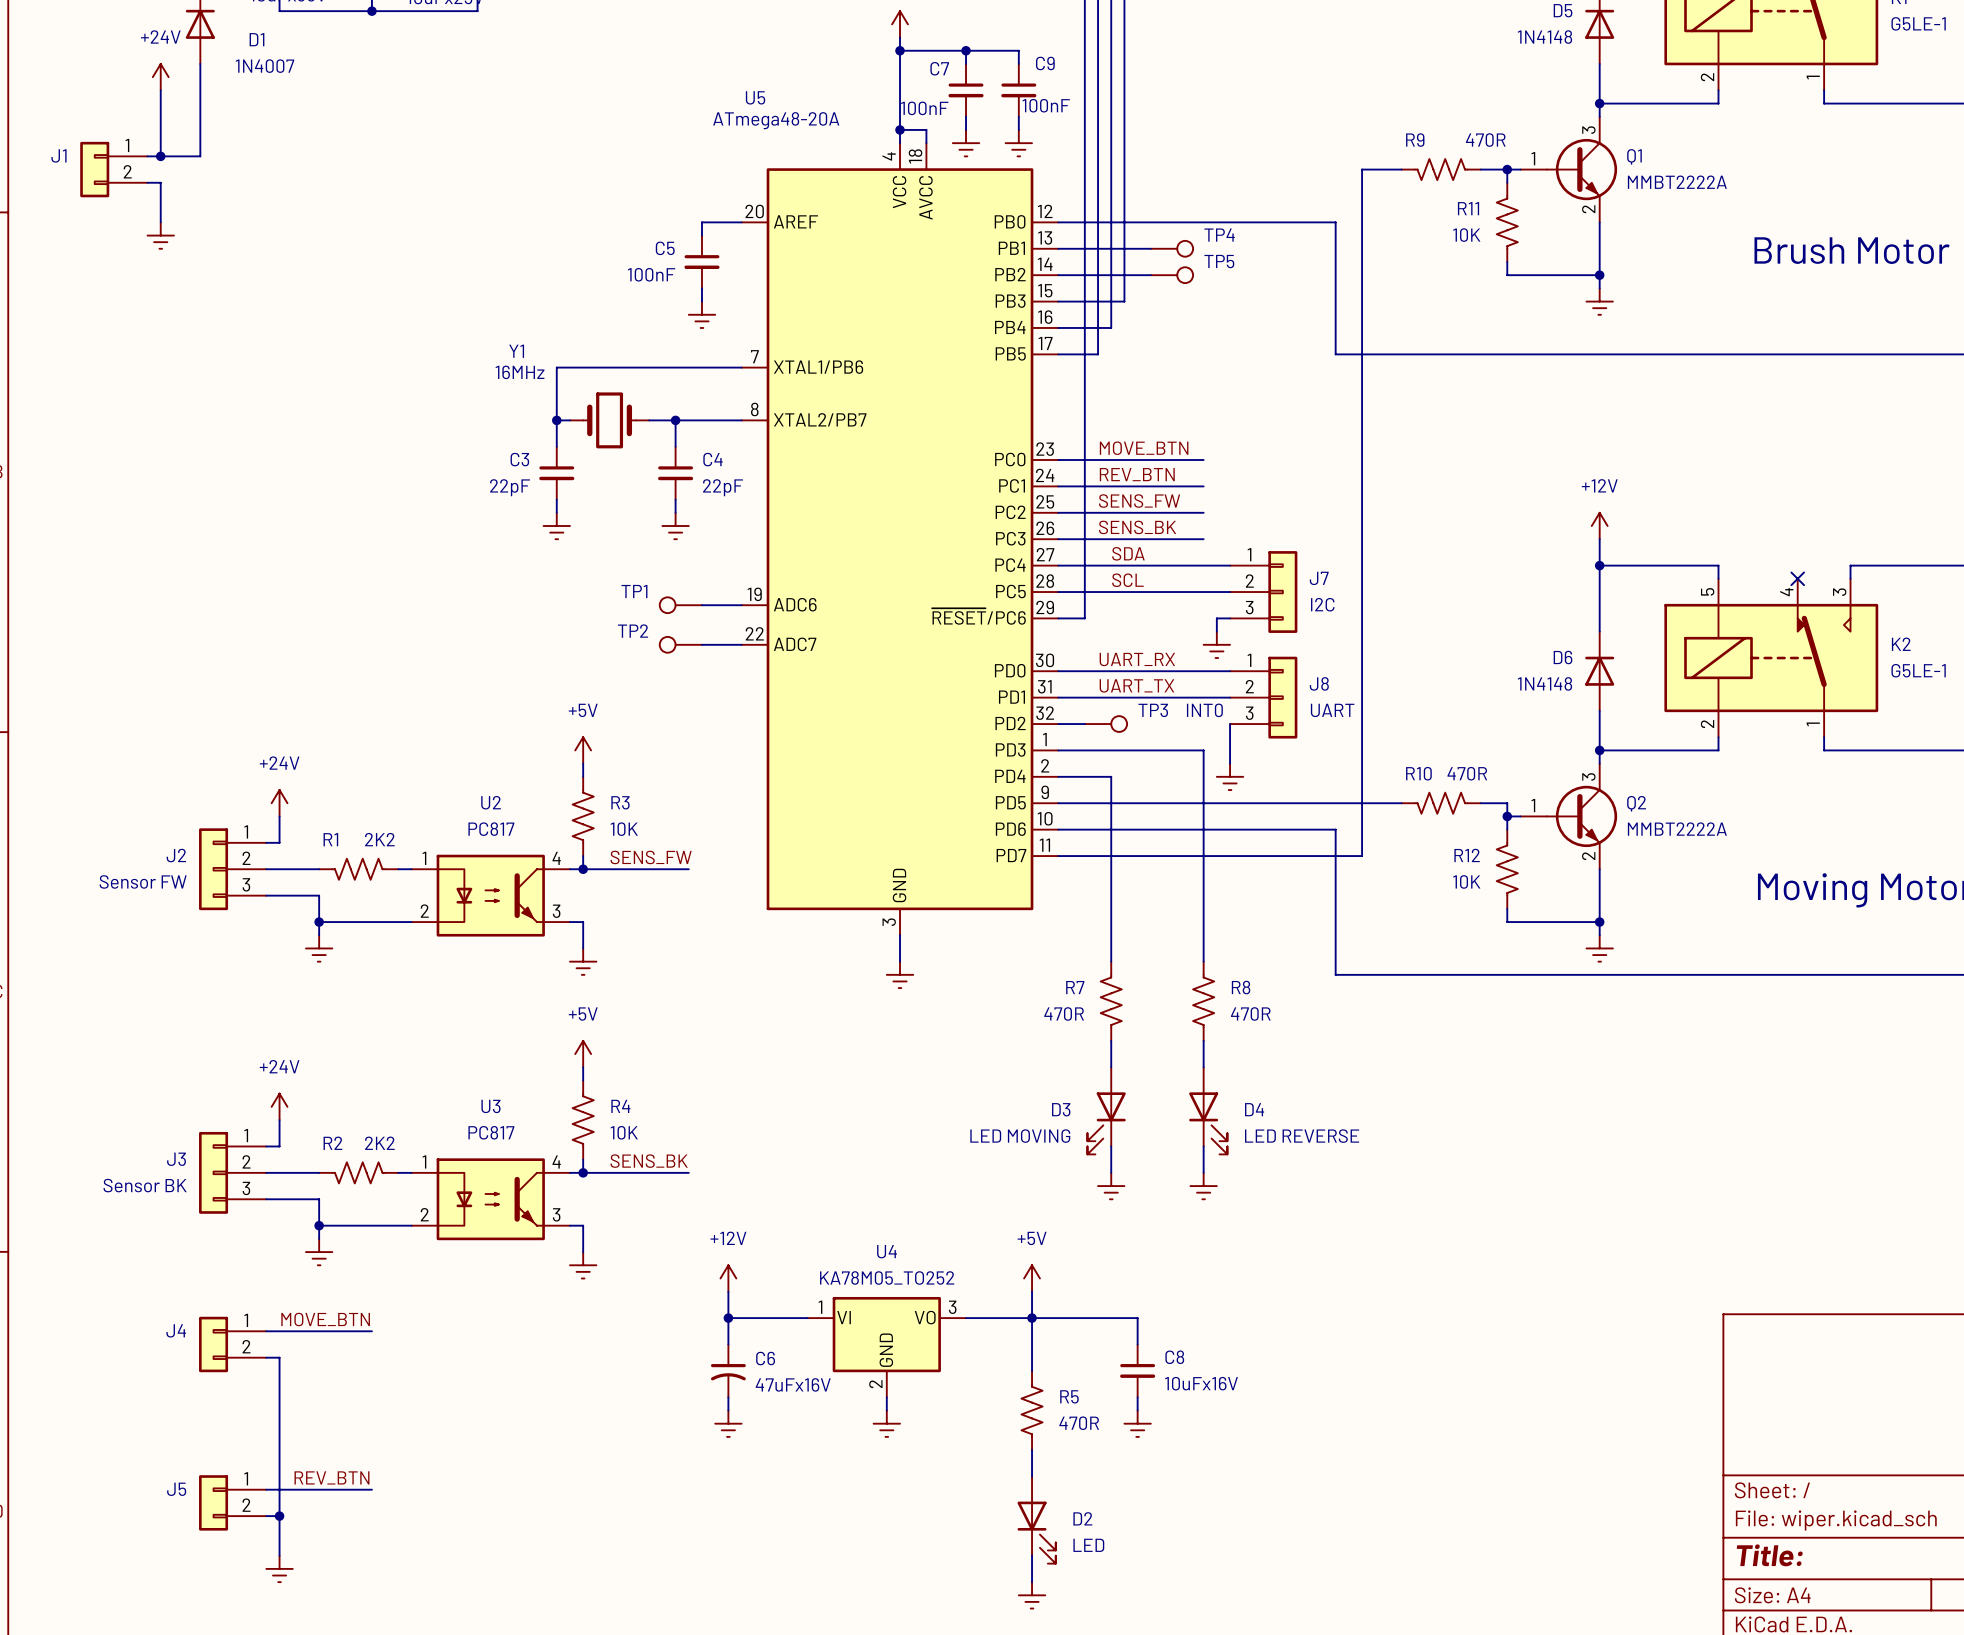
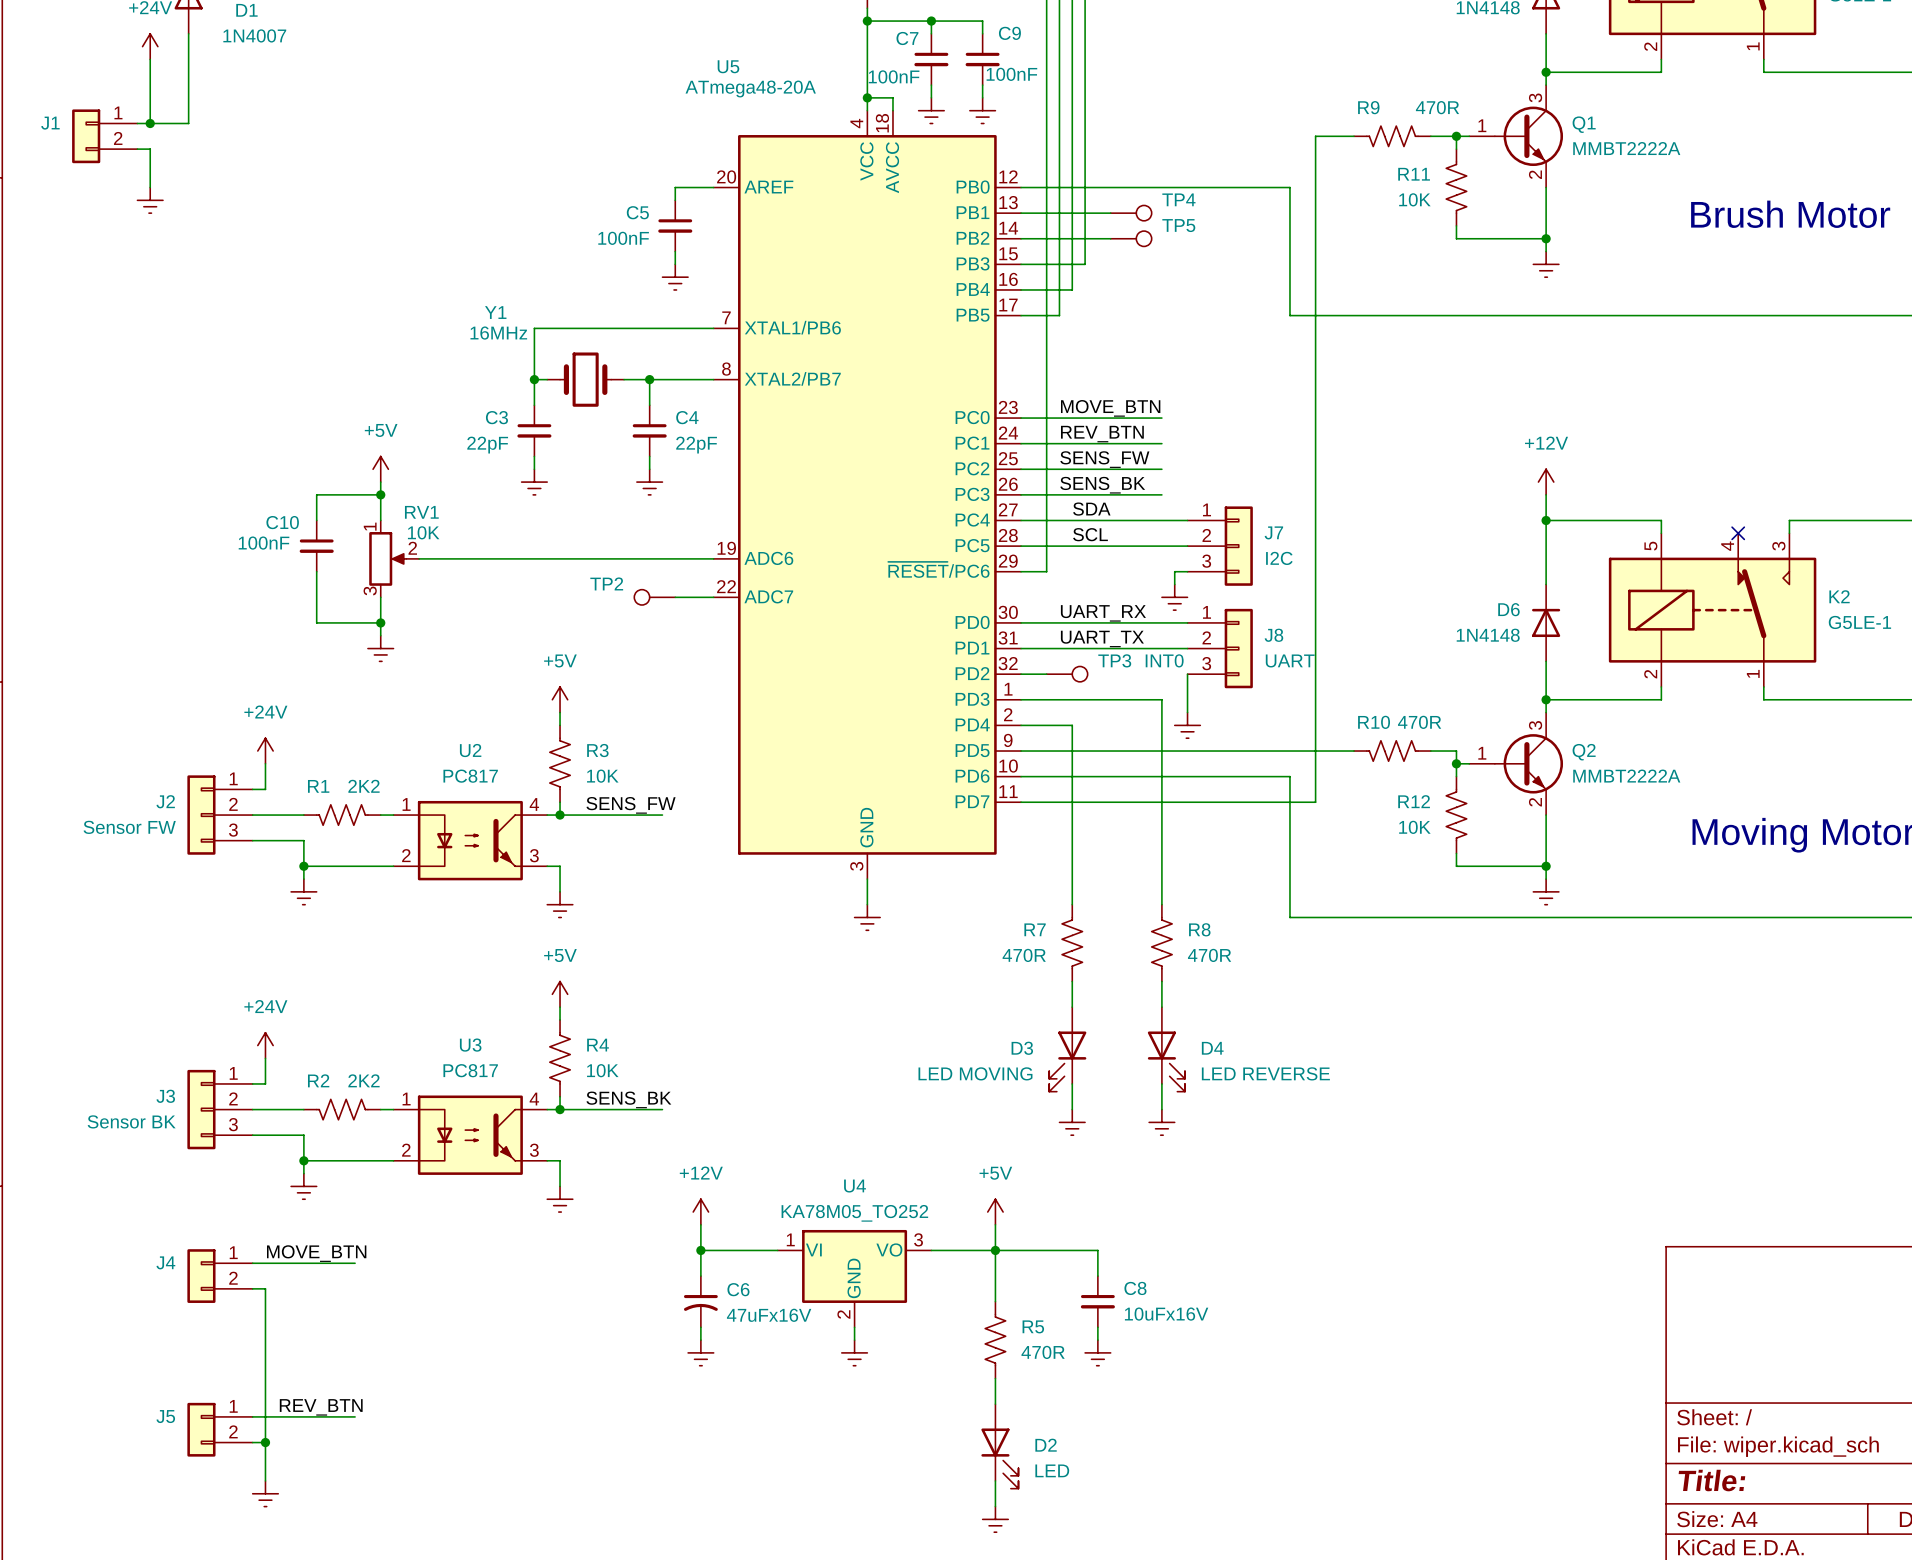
power symbol: none -> +5V (380, 469)
wire: none -> (380, 482) (380, 520)
wire: none -> (380, 494) (316, 494) (316, 520)
junction: none -> (380, 494)
C10: none -> 100nF (316, 546)
RV1: none -> 10K (394, 558)
wire: none -> (419, 558) (675, 558)
TP1: (680, 605) -> none
wire: none -> (316, 571) (316, 622) (380, 622)
wire: none -> (380, 597) (380, 635)
junction: none -> (380, 622)
power symbol: none -> (380, 648)

